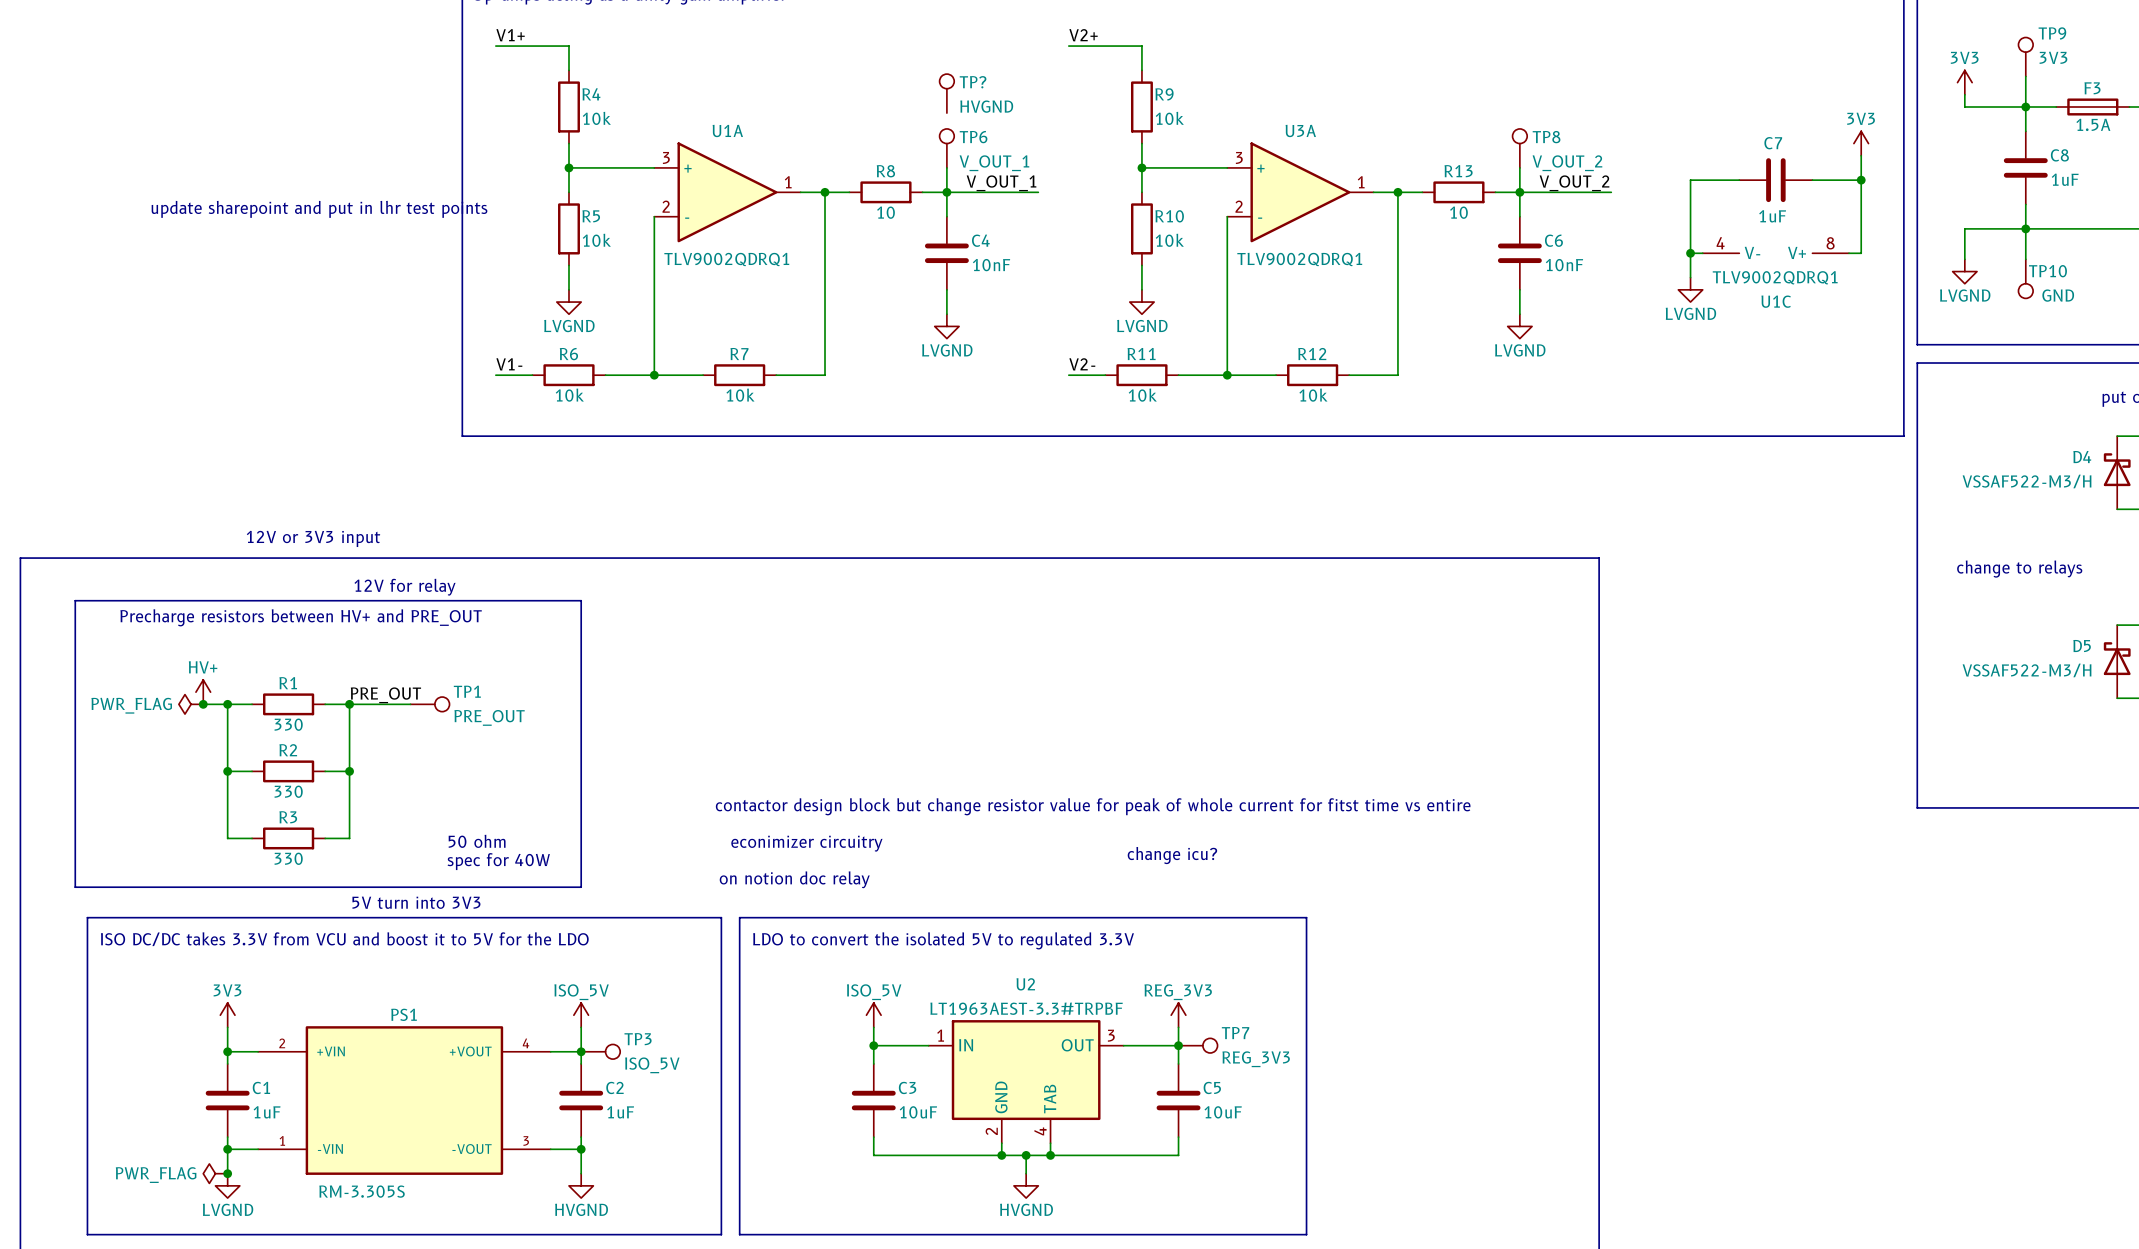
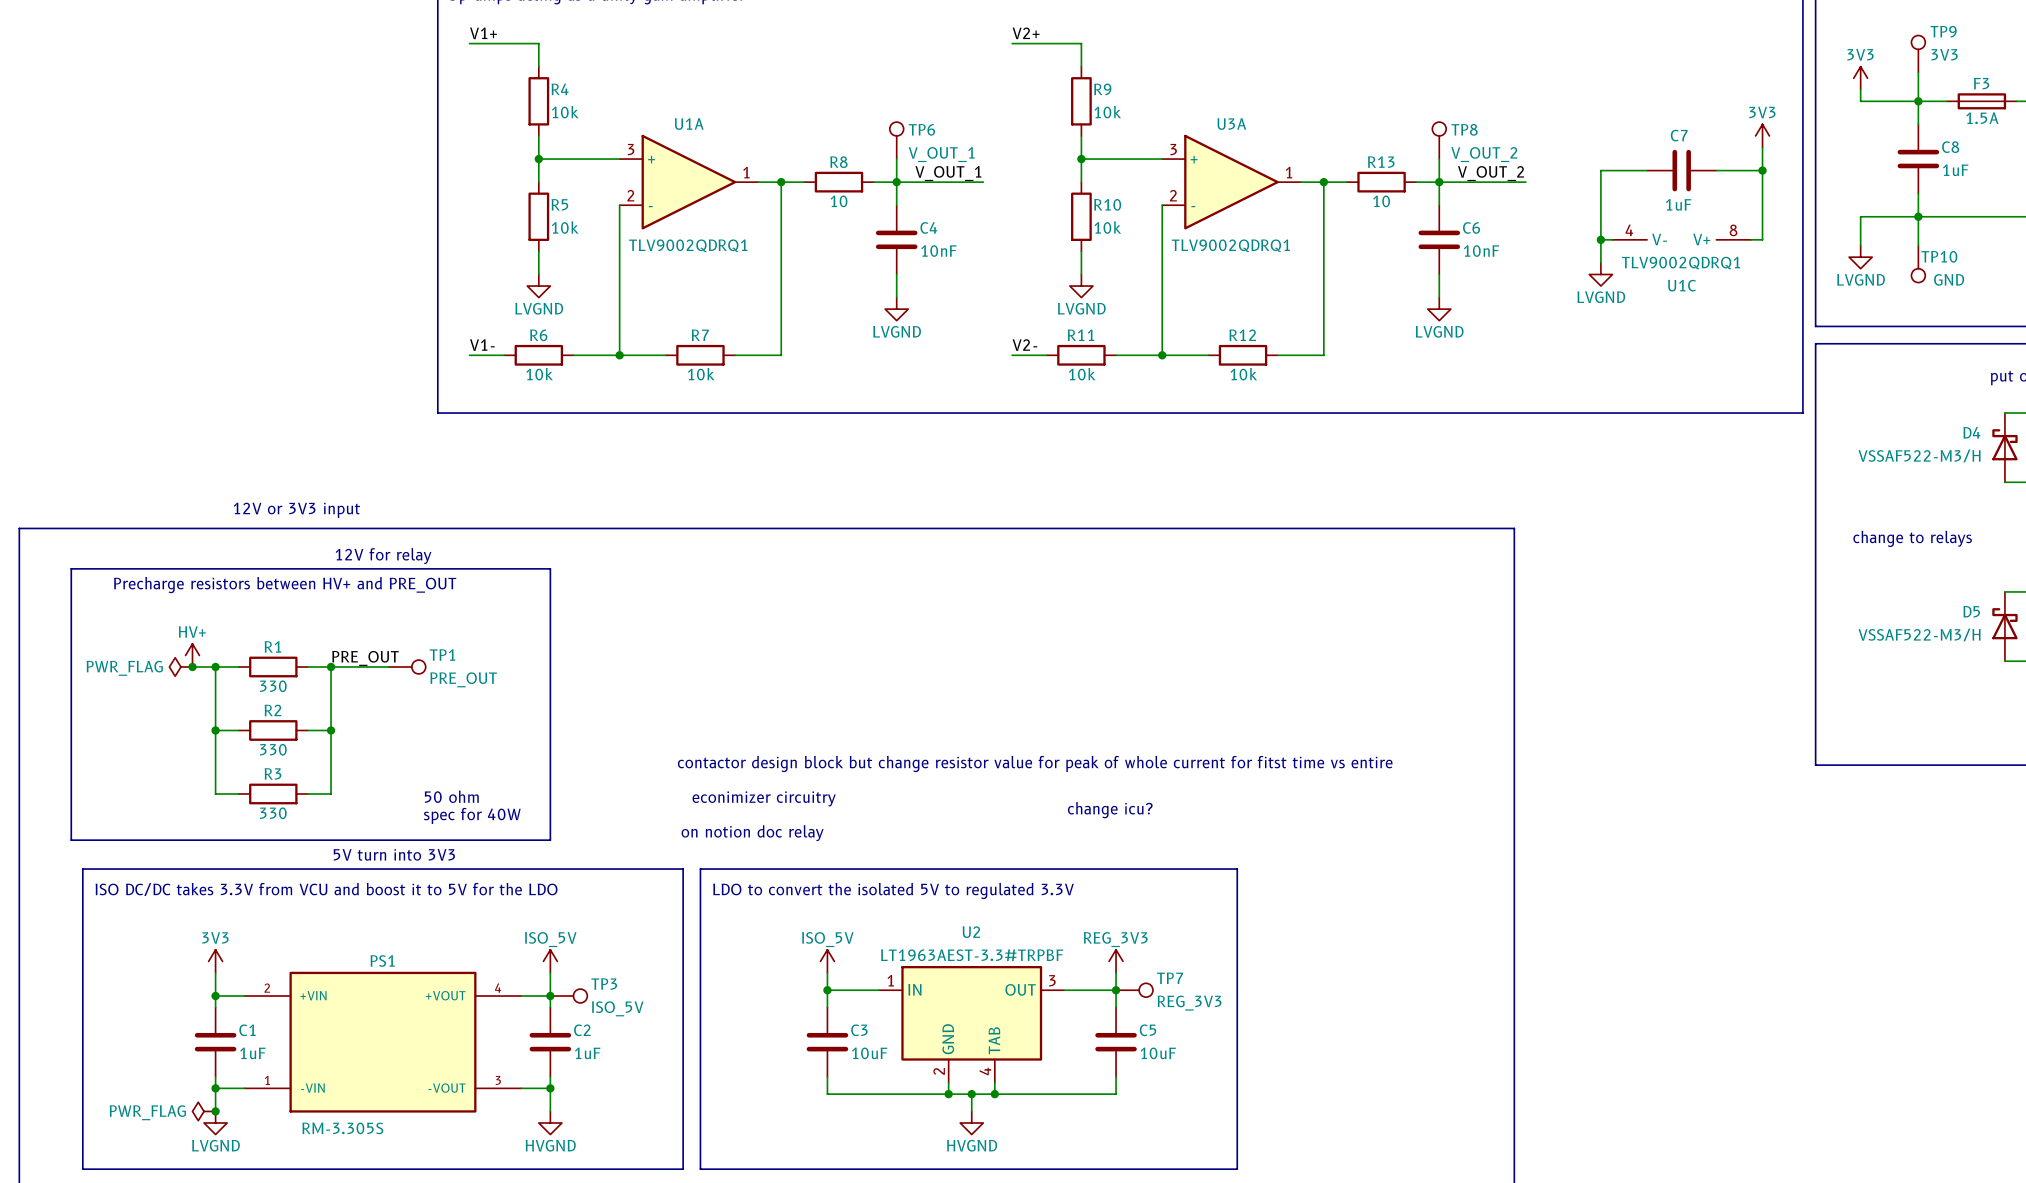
TP?: HVGND (946, 93) -> none
text: update sharepoint and put in lhr test points (319, 209) -> none

